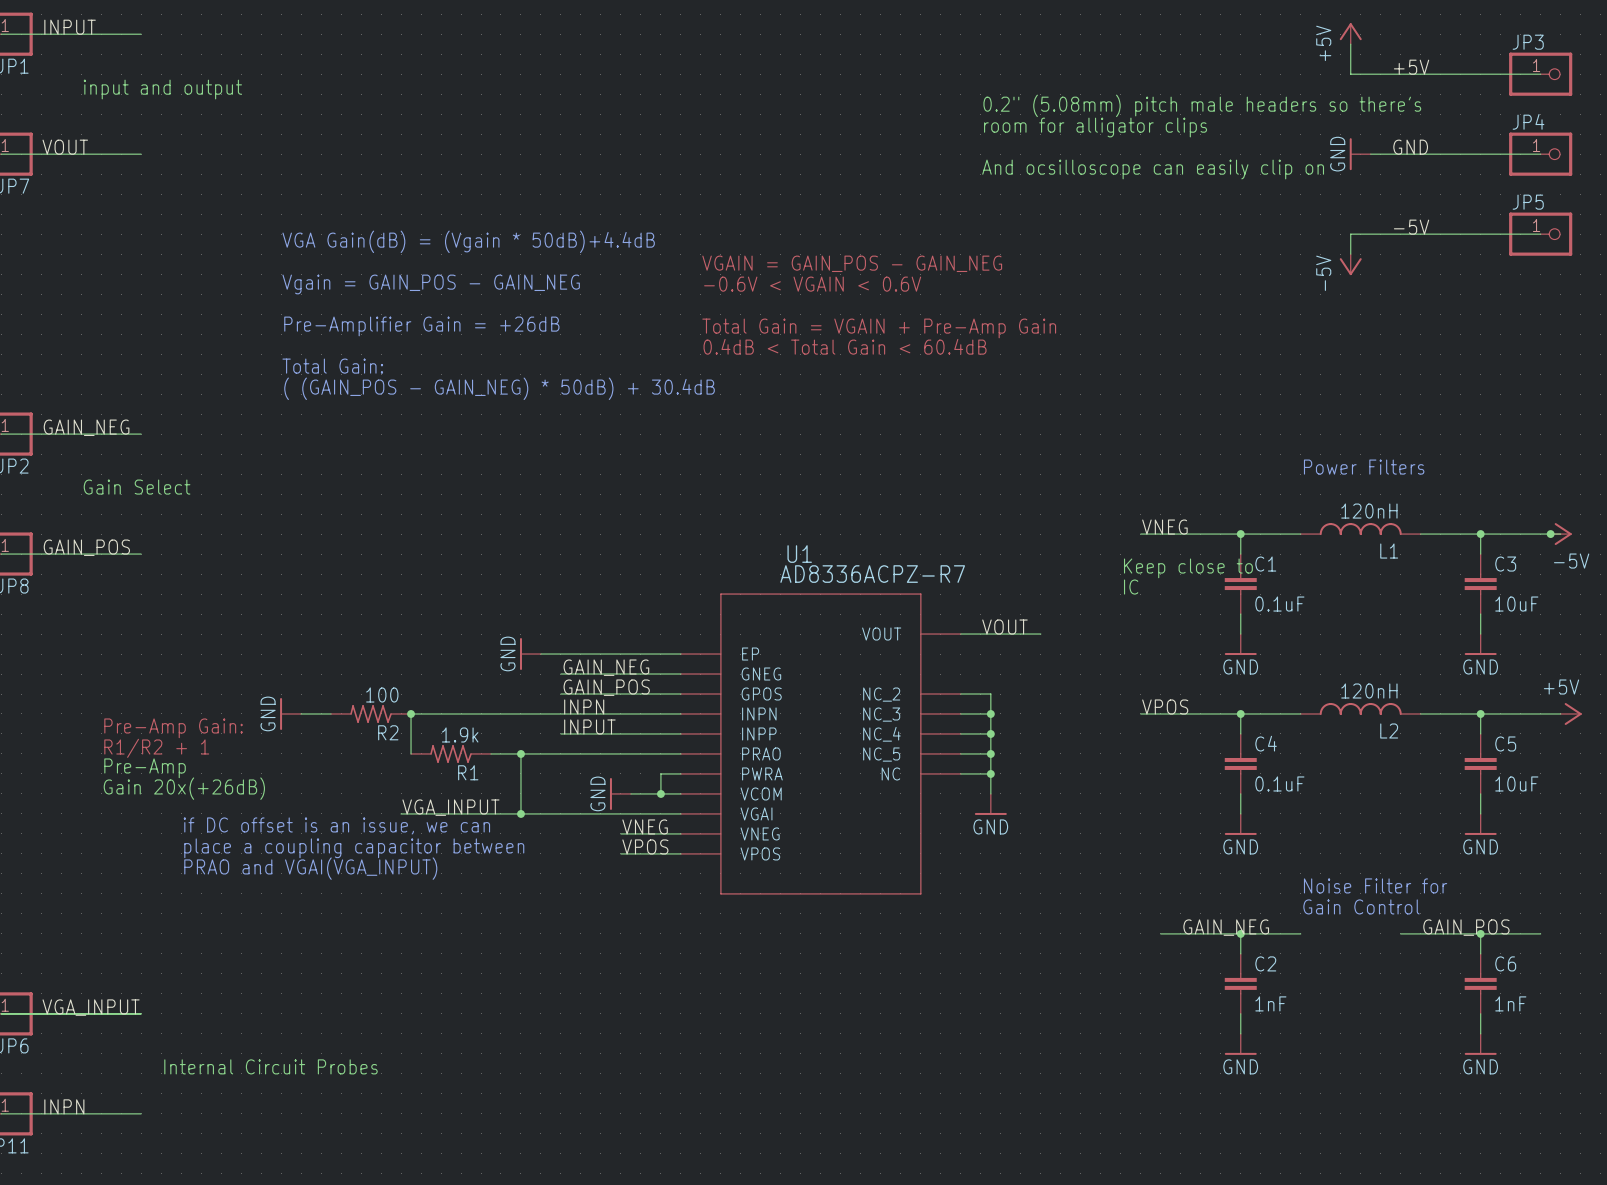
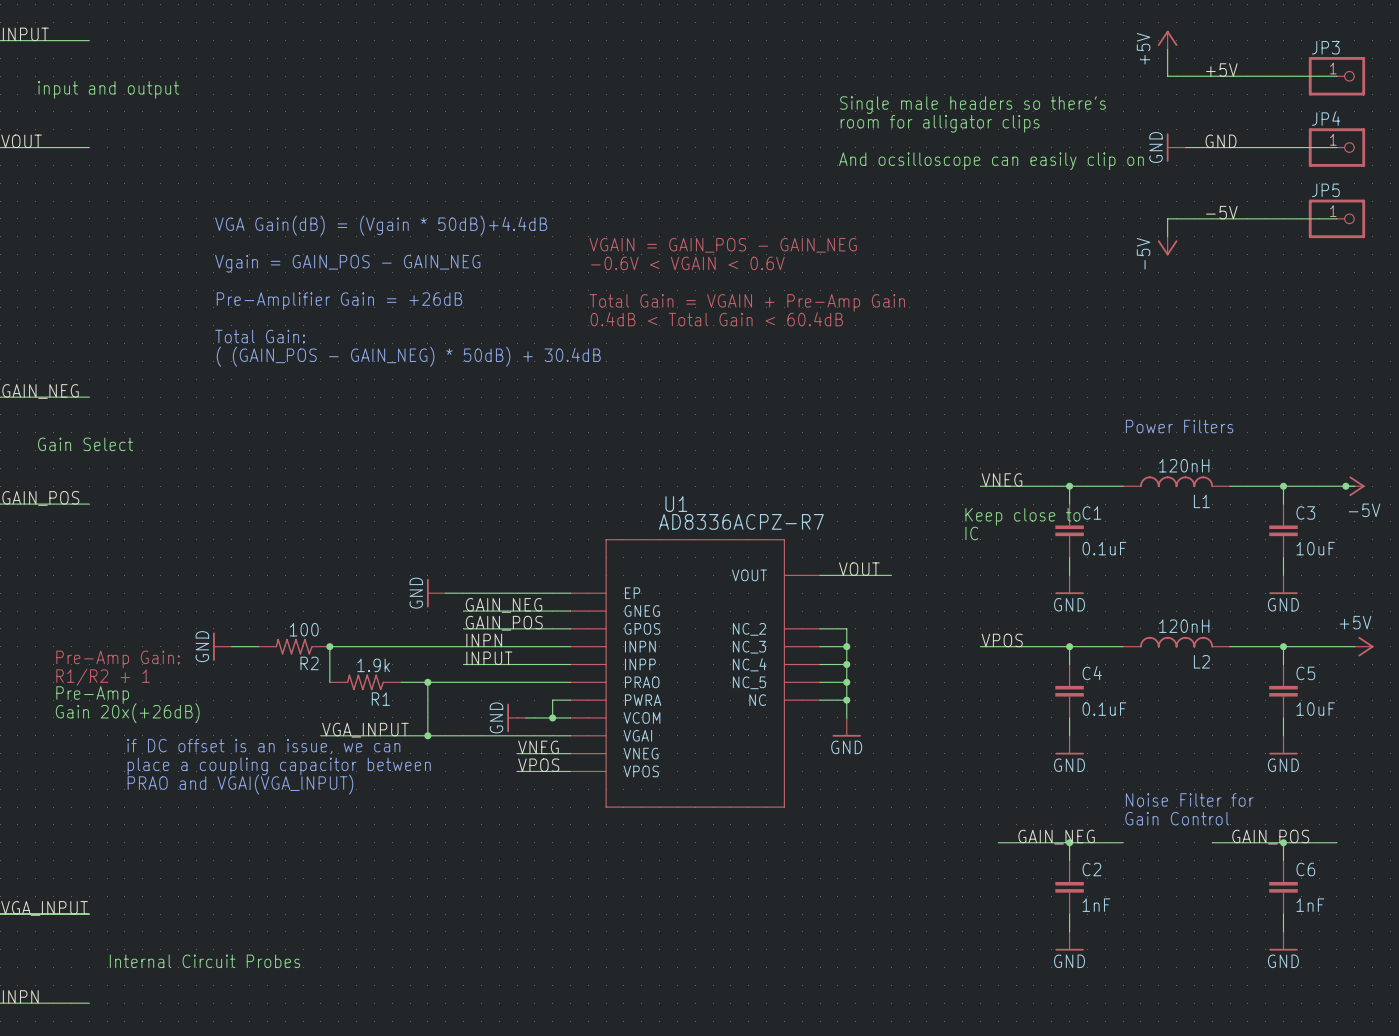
text: 0.2" (5.08mm) pitch male headers so there's (1202, 105) -> Single male headers so there's (973, 105)

